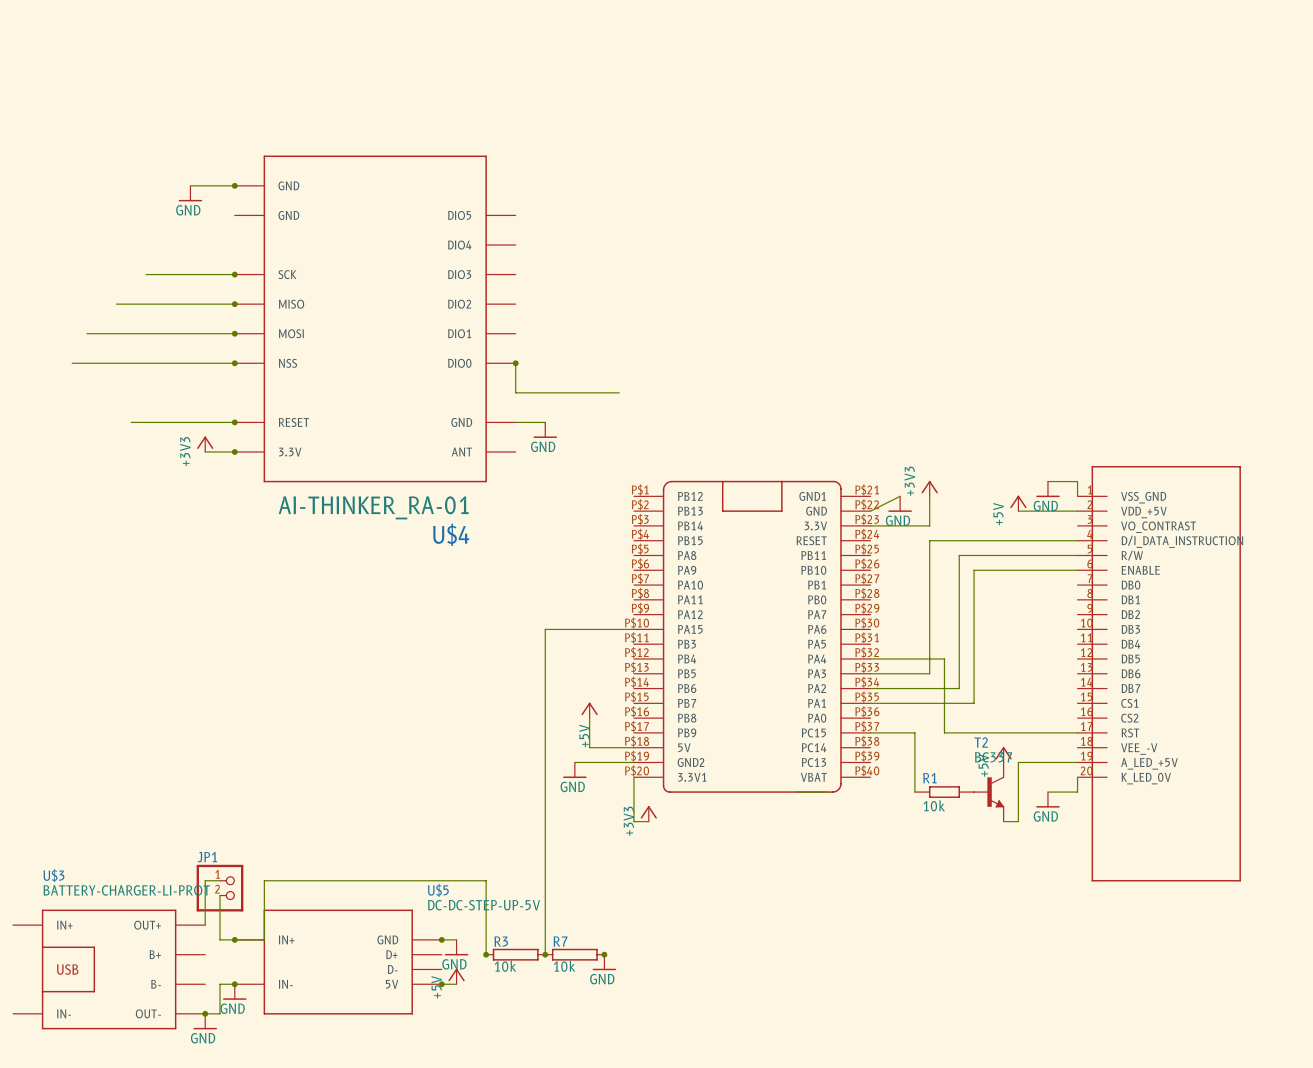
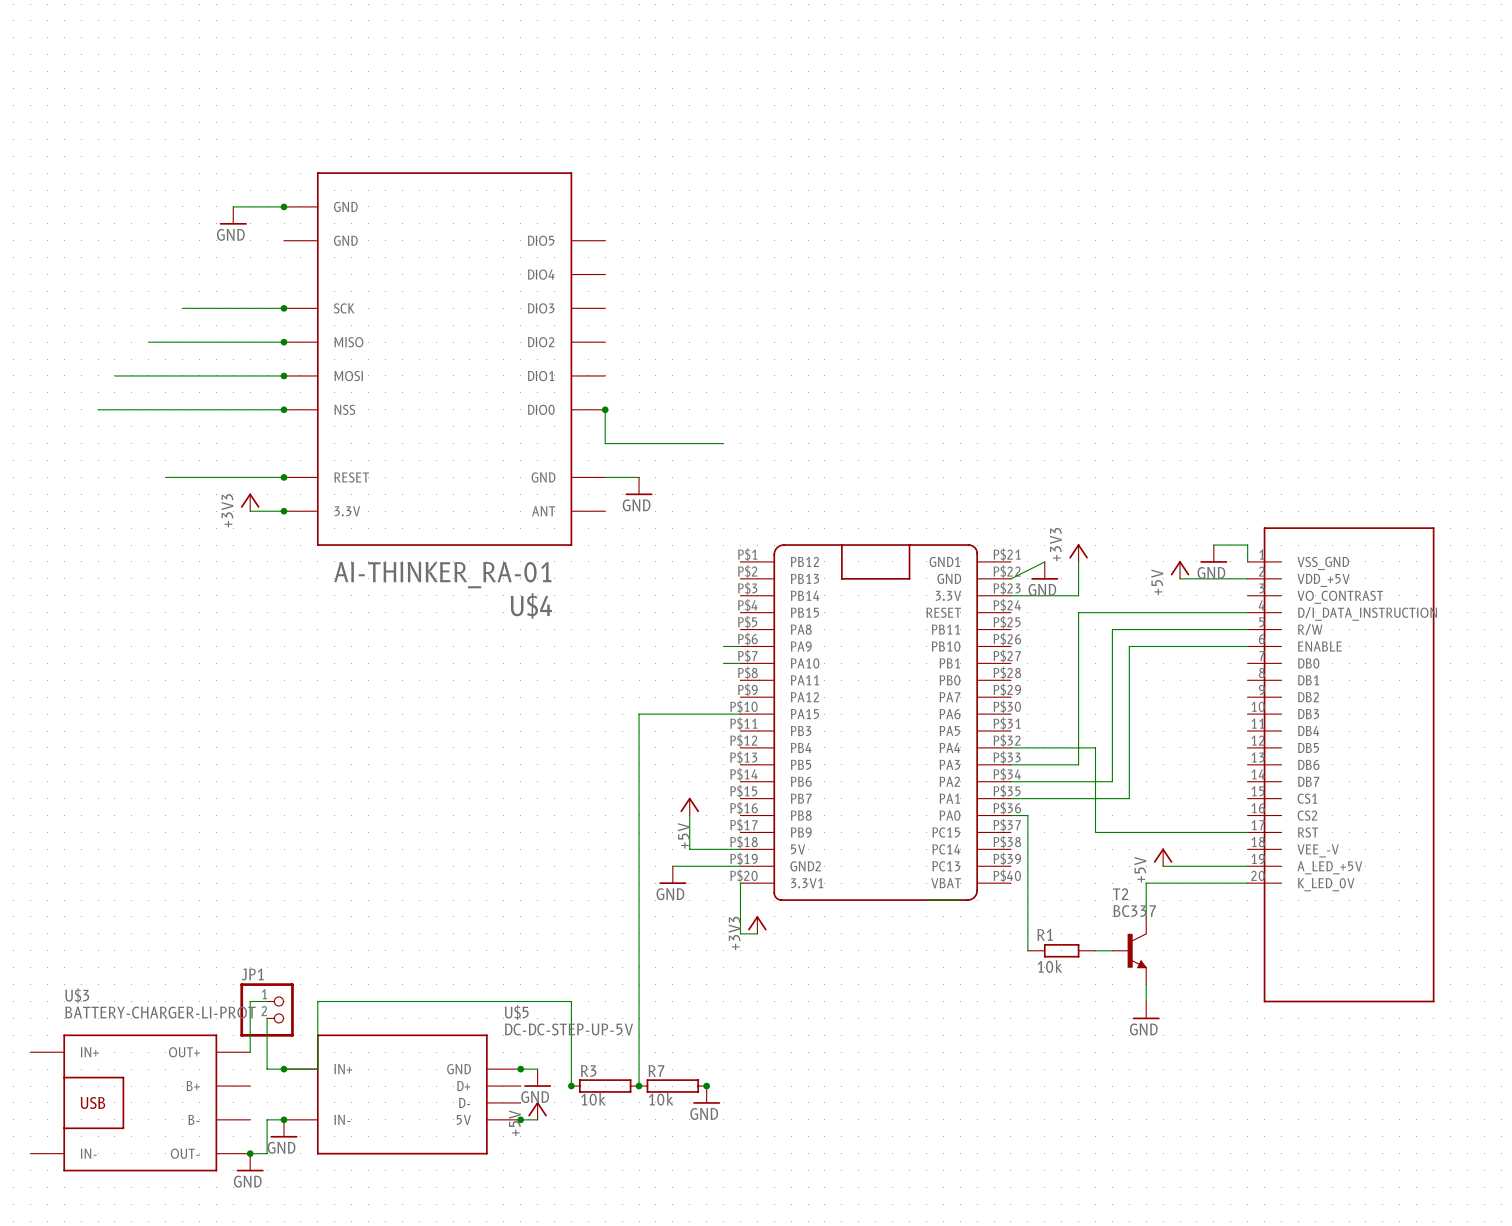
wire: none -> (723, 646) (740, 646)
wire: none -> (723, 663) (740, 663)
wire: none -> (1010, 815) (1027, 815) (1027, 950)
wire: (870, 732) (914, 732) (914, 792) -> none
wire: (1018, 762) (1018, 821) (1003, 821) -> (1180, 866) (1163, 866)
wire: (1077, 777) (1077, 792) (1047, 792) -> (1247, 883) (1146, 883) (1146, 916)
R1 position: (944, 792) -> (1061, 950)
T2 position: (989, 792) -> (1129, 950)
power symbol position: GND (1047, 799) -> GND (1146, 1010)
wire: none -> (1095, 950) (1112, 950)
wire: none -> (1146, 984) (1146, 1001)

